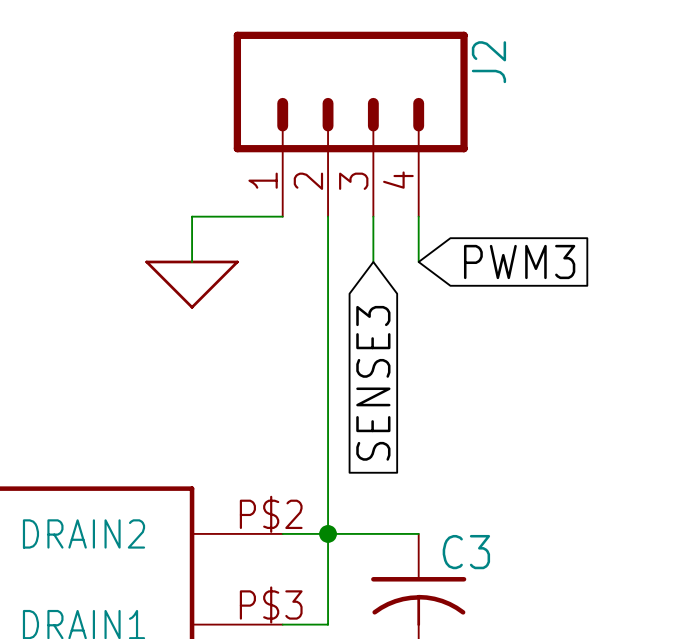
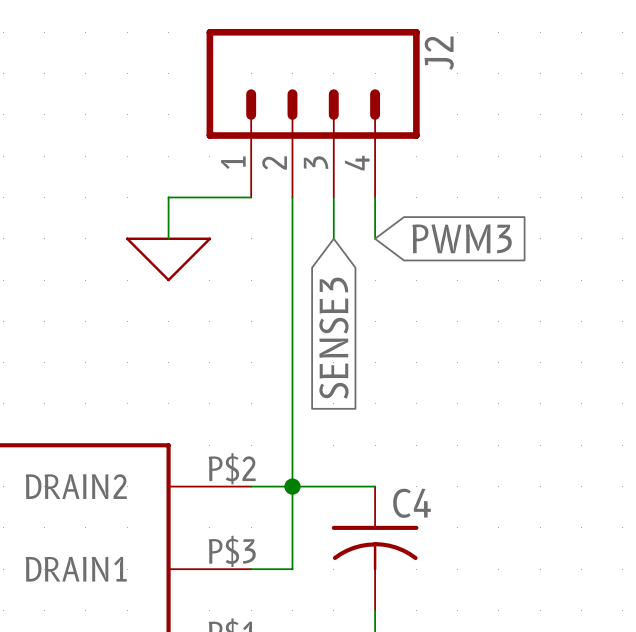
C3 name: C3 (466, 552) -> C4 (412, 503)

